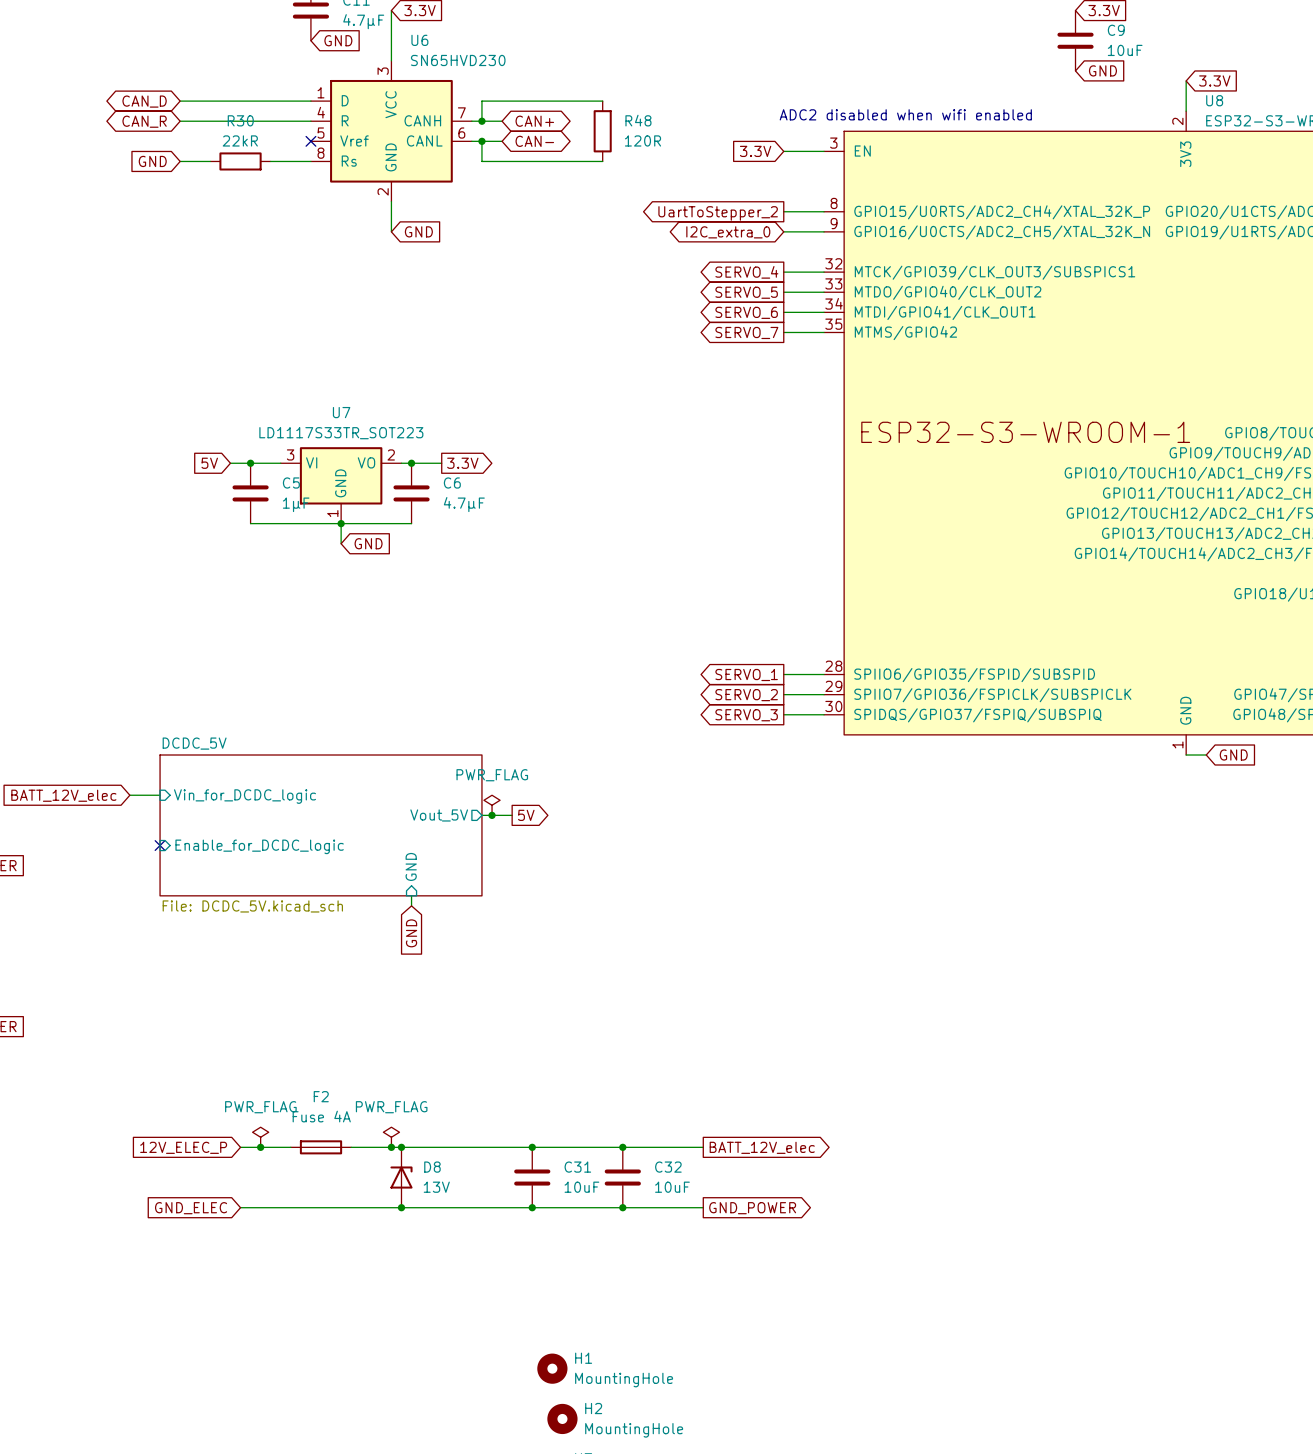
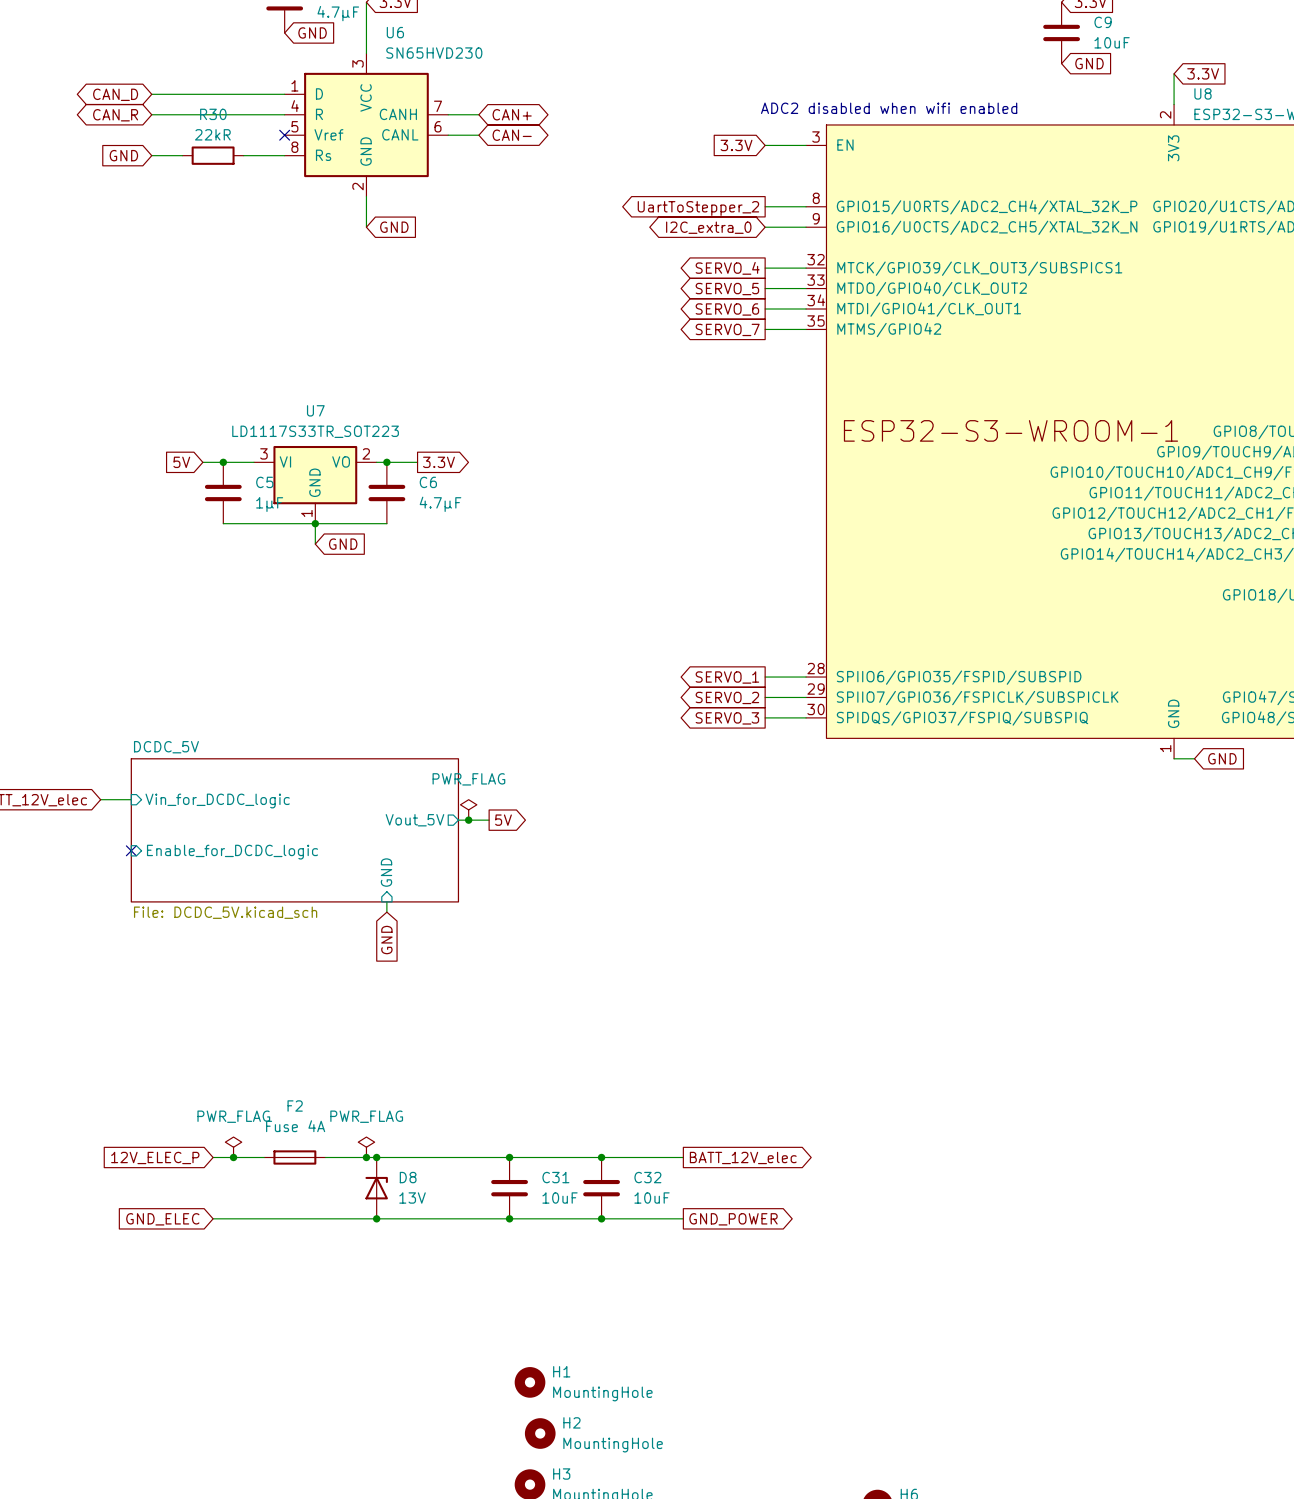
wire: (602, 101) (481, 101) (481, 121) -> none
junction: (481, 121) -> none
R48: 120R (602, 131) -> none
wire: (481, 141) (481, 161) (602, 161) -> none
junction: (481, 141) -> none

